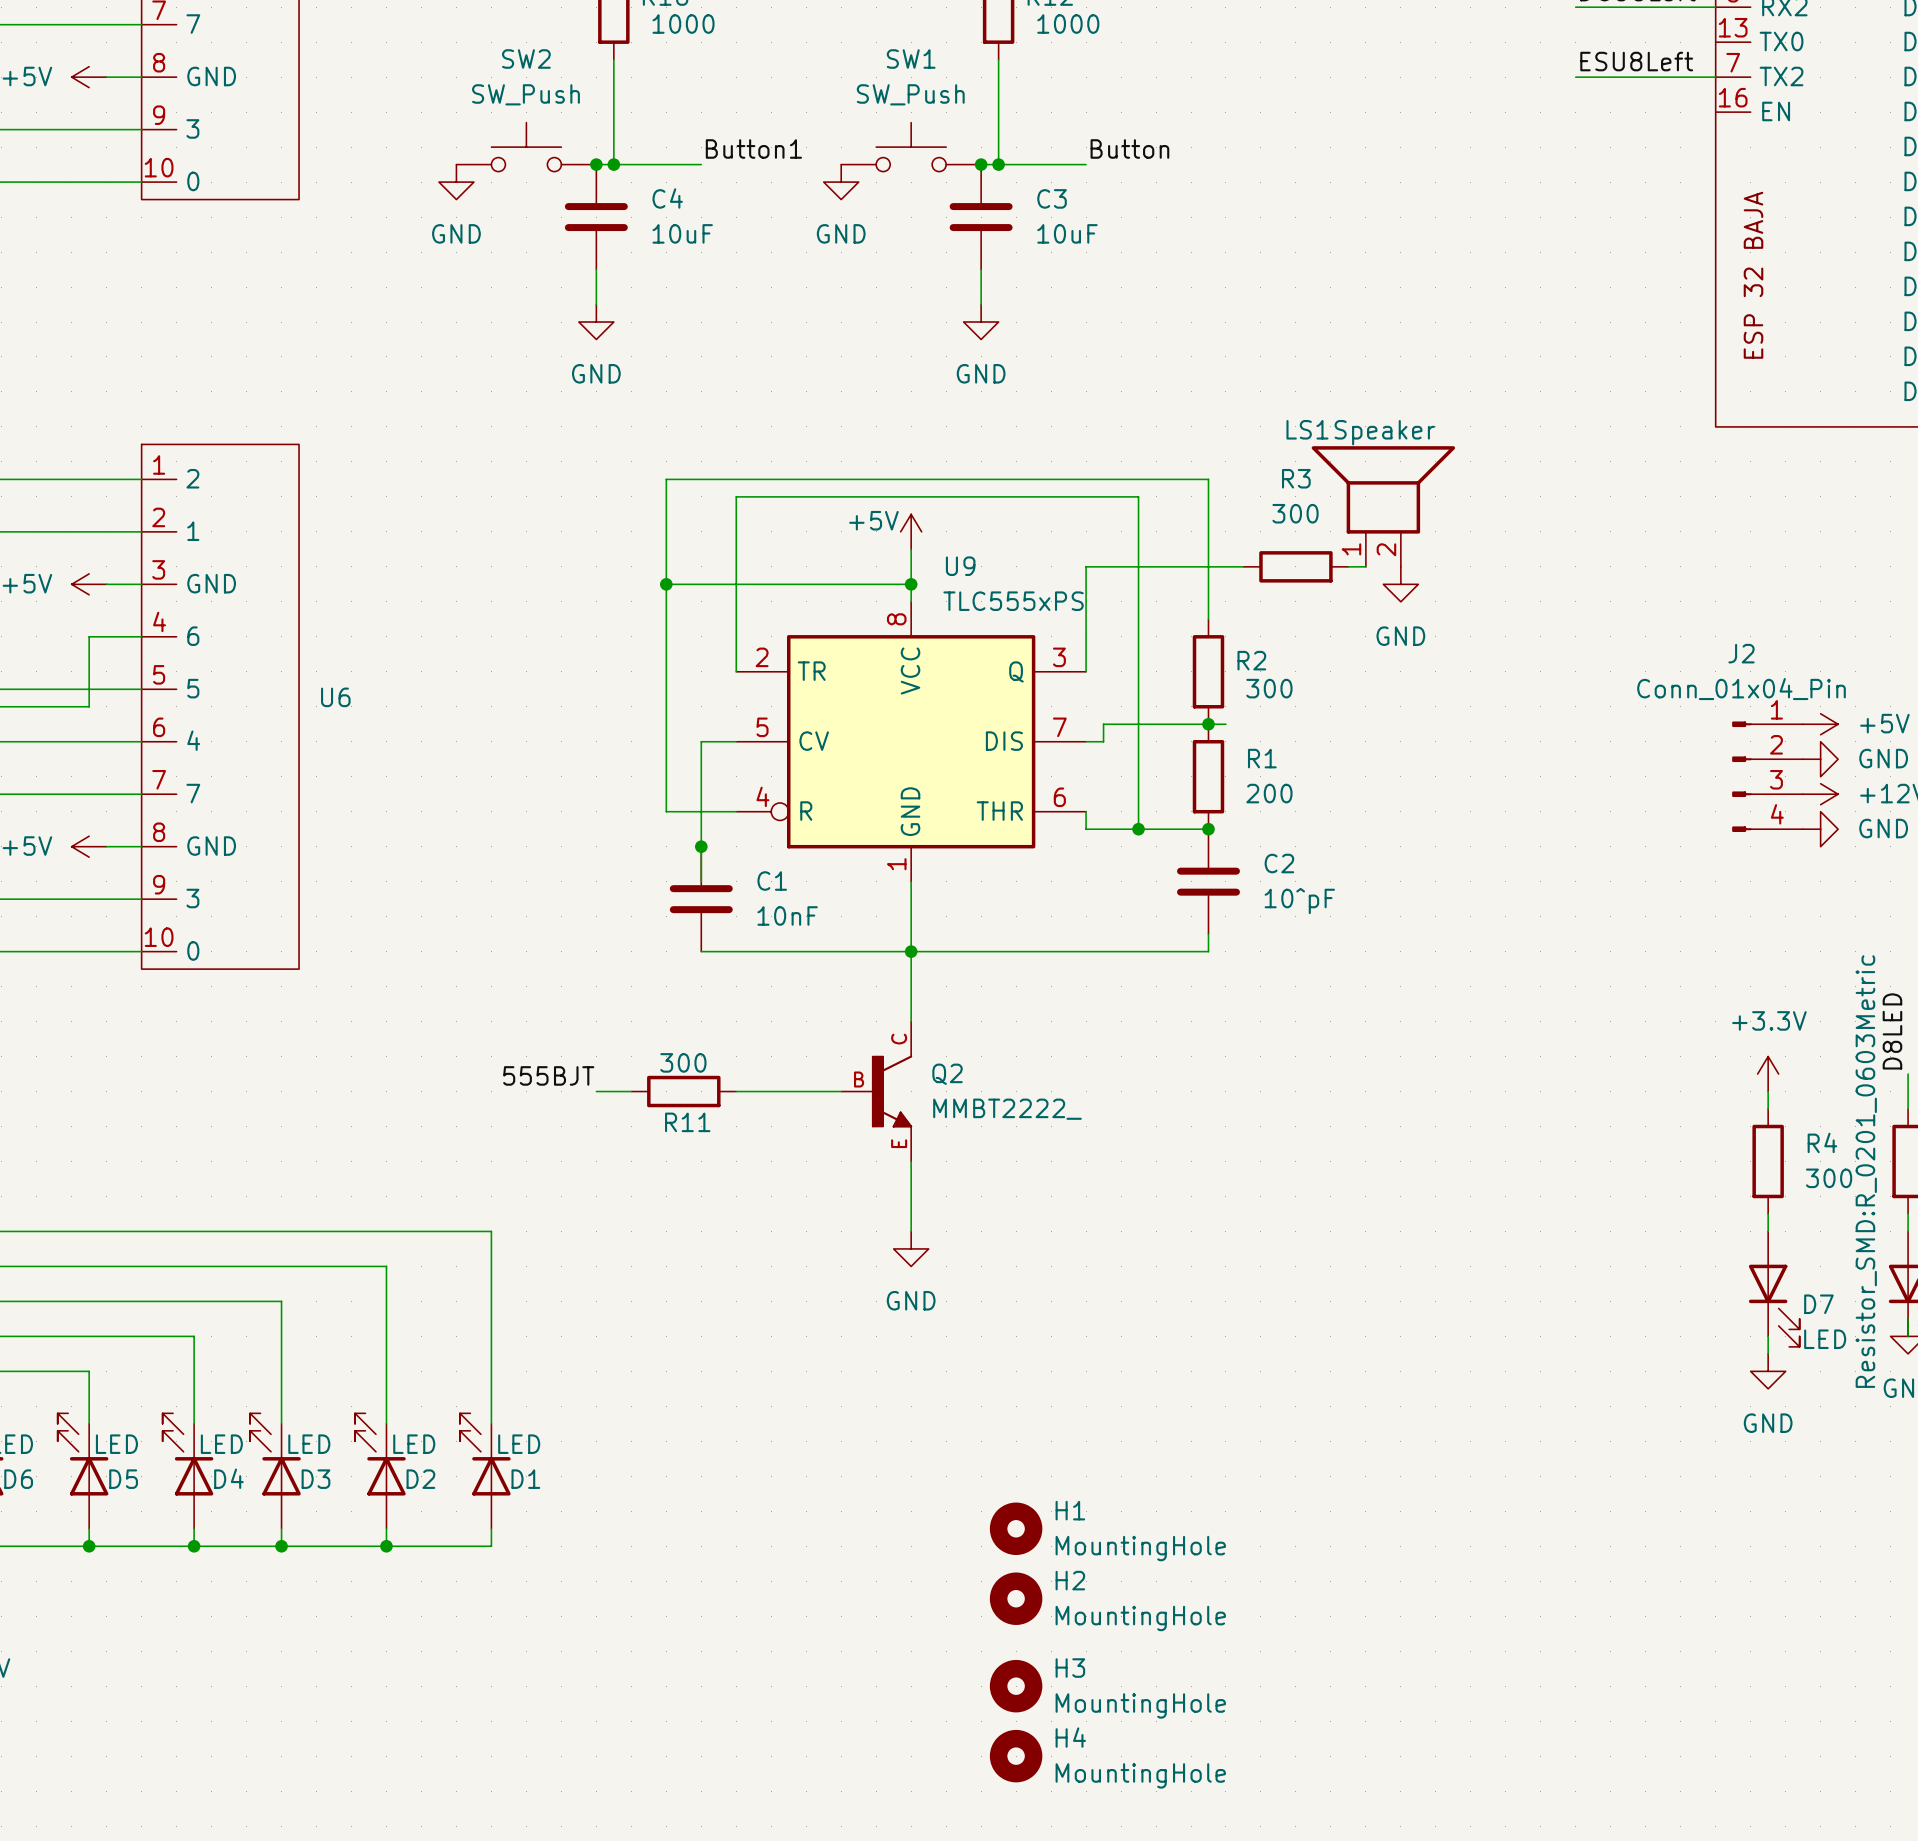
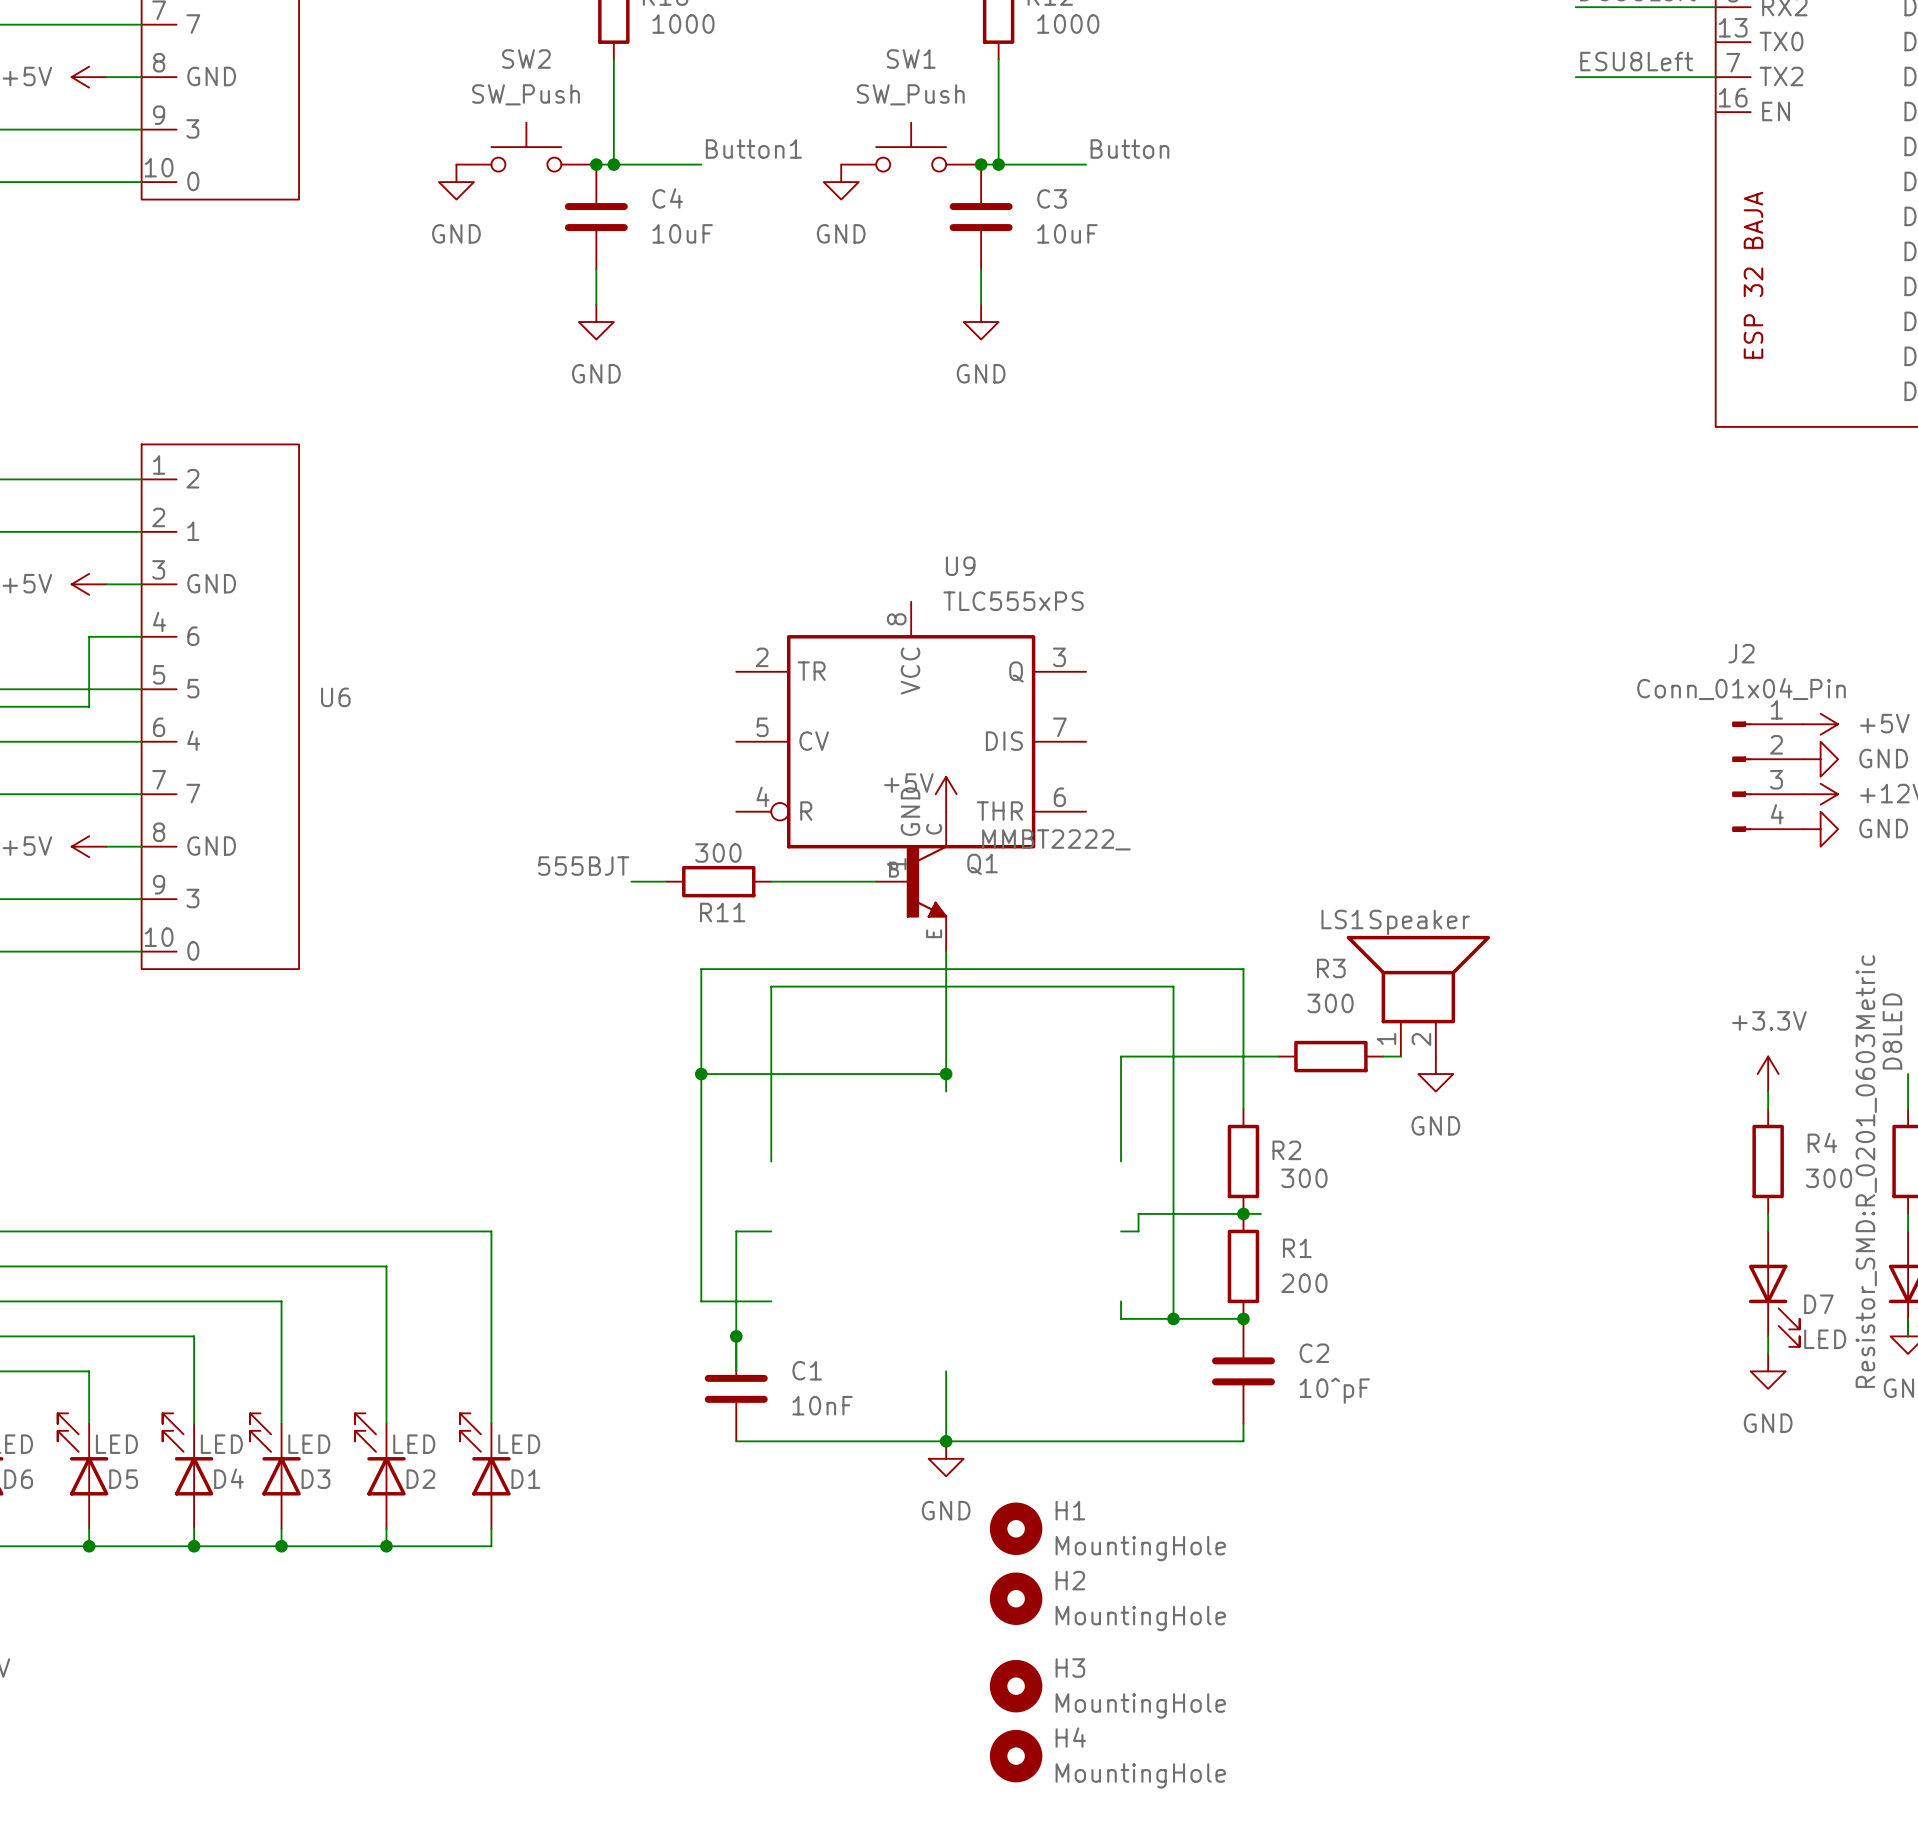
LS1 position: (1383, 506) -> (1418, 996)
power symbol position: +5V (911, 531) -> +5V (946, 794)
wire: (911, 549) (911, 601) -> none
wire: (1243, 566) (1086, 566) (1086, 671) -> none
R3 position: (1295, 566) -> (1330, 1056)
wire: (1348, 566) (1365, 566) -> none
wire: (666, 584) (911, 584) -> none
junction: (666, 584) -> none
junction: (911, 584) -> none
power symbol: GND (1400, 584) -> none
wire: (1208, 619) (1208, 479) (666, 479) (666, 811) (736, 811) -> none
wire: (736, 671) (736, 496) (1138, 496) (1138, 829) -> none
R2 position: (1208, 671) -> (1243, 1161)
junction: (1208, 724) -> none
wire: (1225, 724) (1103, 724) (1103, 741) (1086, 741) -> none
wire: (736, 741) (701, 741) (701, 881) -> none
R1 position: (1208, 776) -> (1243, 1266)
wire: (1086, 811) (1086, 829) (1208, 829) -> none
junction: (1138, 829) -> none
junction: (1208, 829) -> none
junction: (701, 846) -> none
wire: (911, 881) (911, 1021) -> (946, 951) (946, 1091)
Q1: none -> MMBT2222_ (911, 881)
C2 position: (1208, 881) -> (1243, 1371)
C1 position: (701, 899) -> (736, 1388)
wire: (1208, 934) (1208, 951) (701, 951) -> none
junction: (911, 951) -> none
wire: none -> (1278, 1056) (1121, 1056) (1121, 1161)
wire: none -> (1383, 1056) (1400, 1056)
wire: none -> (701, 1074) (946, 1074)
junction: none -> (701, 1074)
junction: none -> (946, 1074)
power symbol: none -> GND (1435, 1074)
label position: 555BJT (548, 1075) -> 555BJT (583, 866)
wire: (596, 1091) (631, 1091) -> (631, 881) (666, 881)
R11 position: (683, 1091) -> (718, 881)
wire: (736, 1091) (841, 1091) -> (771, 881) (876, 881)
Q2: MMBT2222_ (876, 1091) -> none
wire: none -> (1243, 1109) (1243, 969) (701, 969) (701, 1301) (771, 1301)
wire: none -> (771, 1161) (771, 986) (1173, 986) (1173, 1318)
wire: (911, 1161) (911, 1231) -> (946, 1371) (946, 1441)
junction: none -> (1243, 1213)
wire: none -> (1260, 1213) (1138, 1213) (1138, 1231) (1121, 1231)
wire: none -> (771, 1231) (736, 1231) (736, 1371)
power symbol position: GND (911, 1248) -> GND (946, 1458)
wire: none -> (1121, 1301) (1121, 1318) (1243, 1318)
junction: none -> (1173, 1318)
junction: none -> (1243, 1318)
junction: none -> (736, 1336)
wire: none -> (1243, 1423) (1243, 1441) (736, 1441)
junction: none -> (946, 1441)

